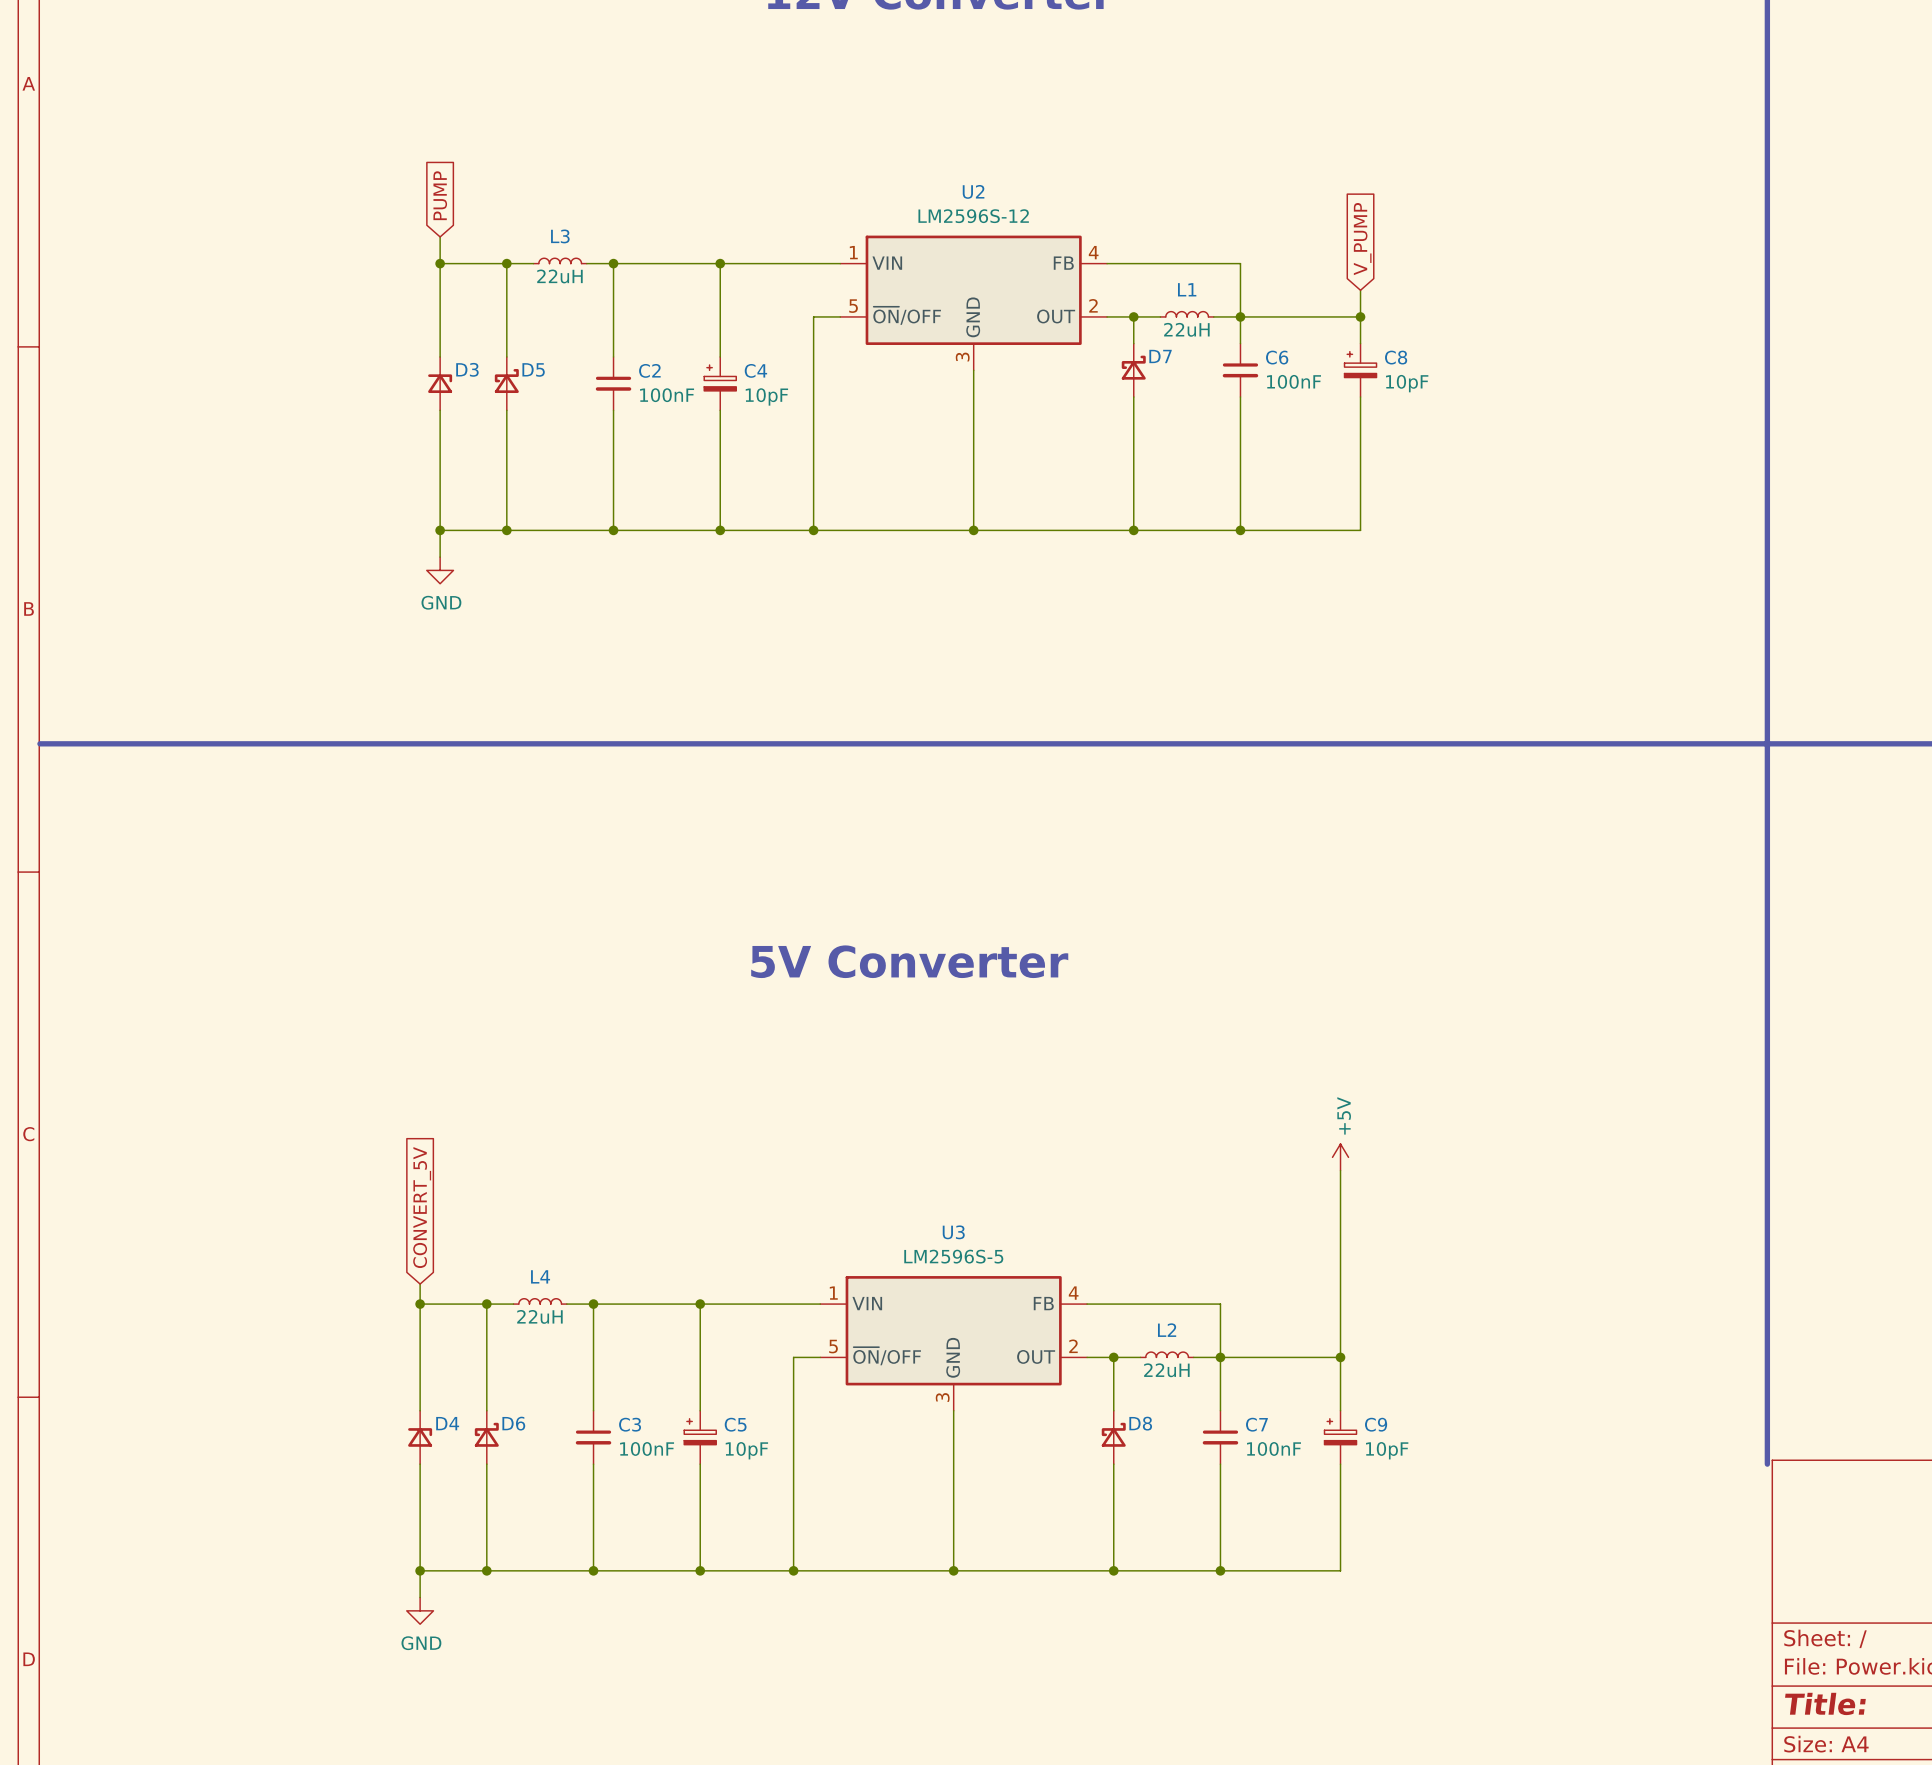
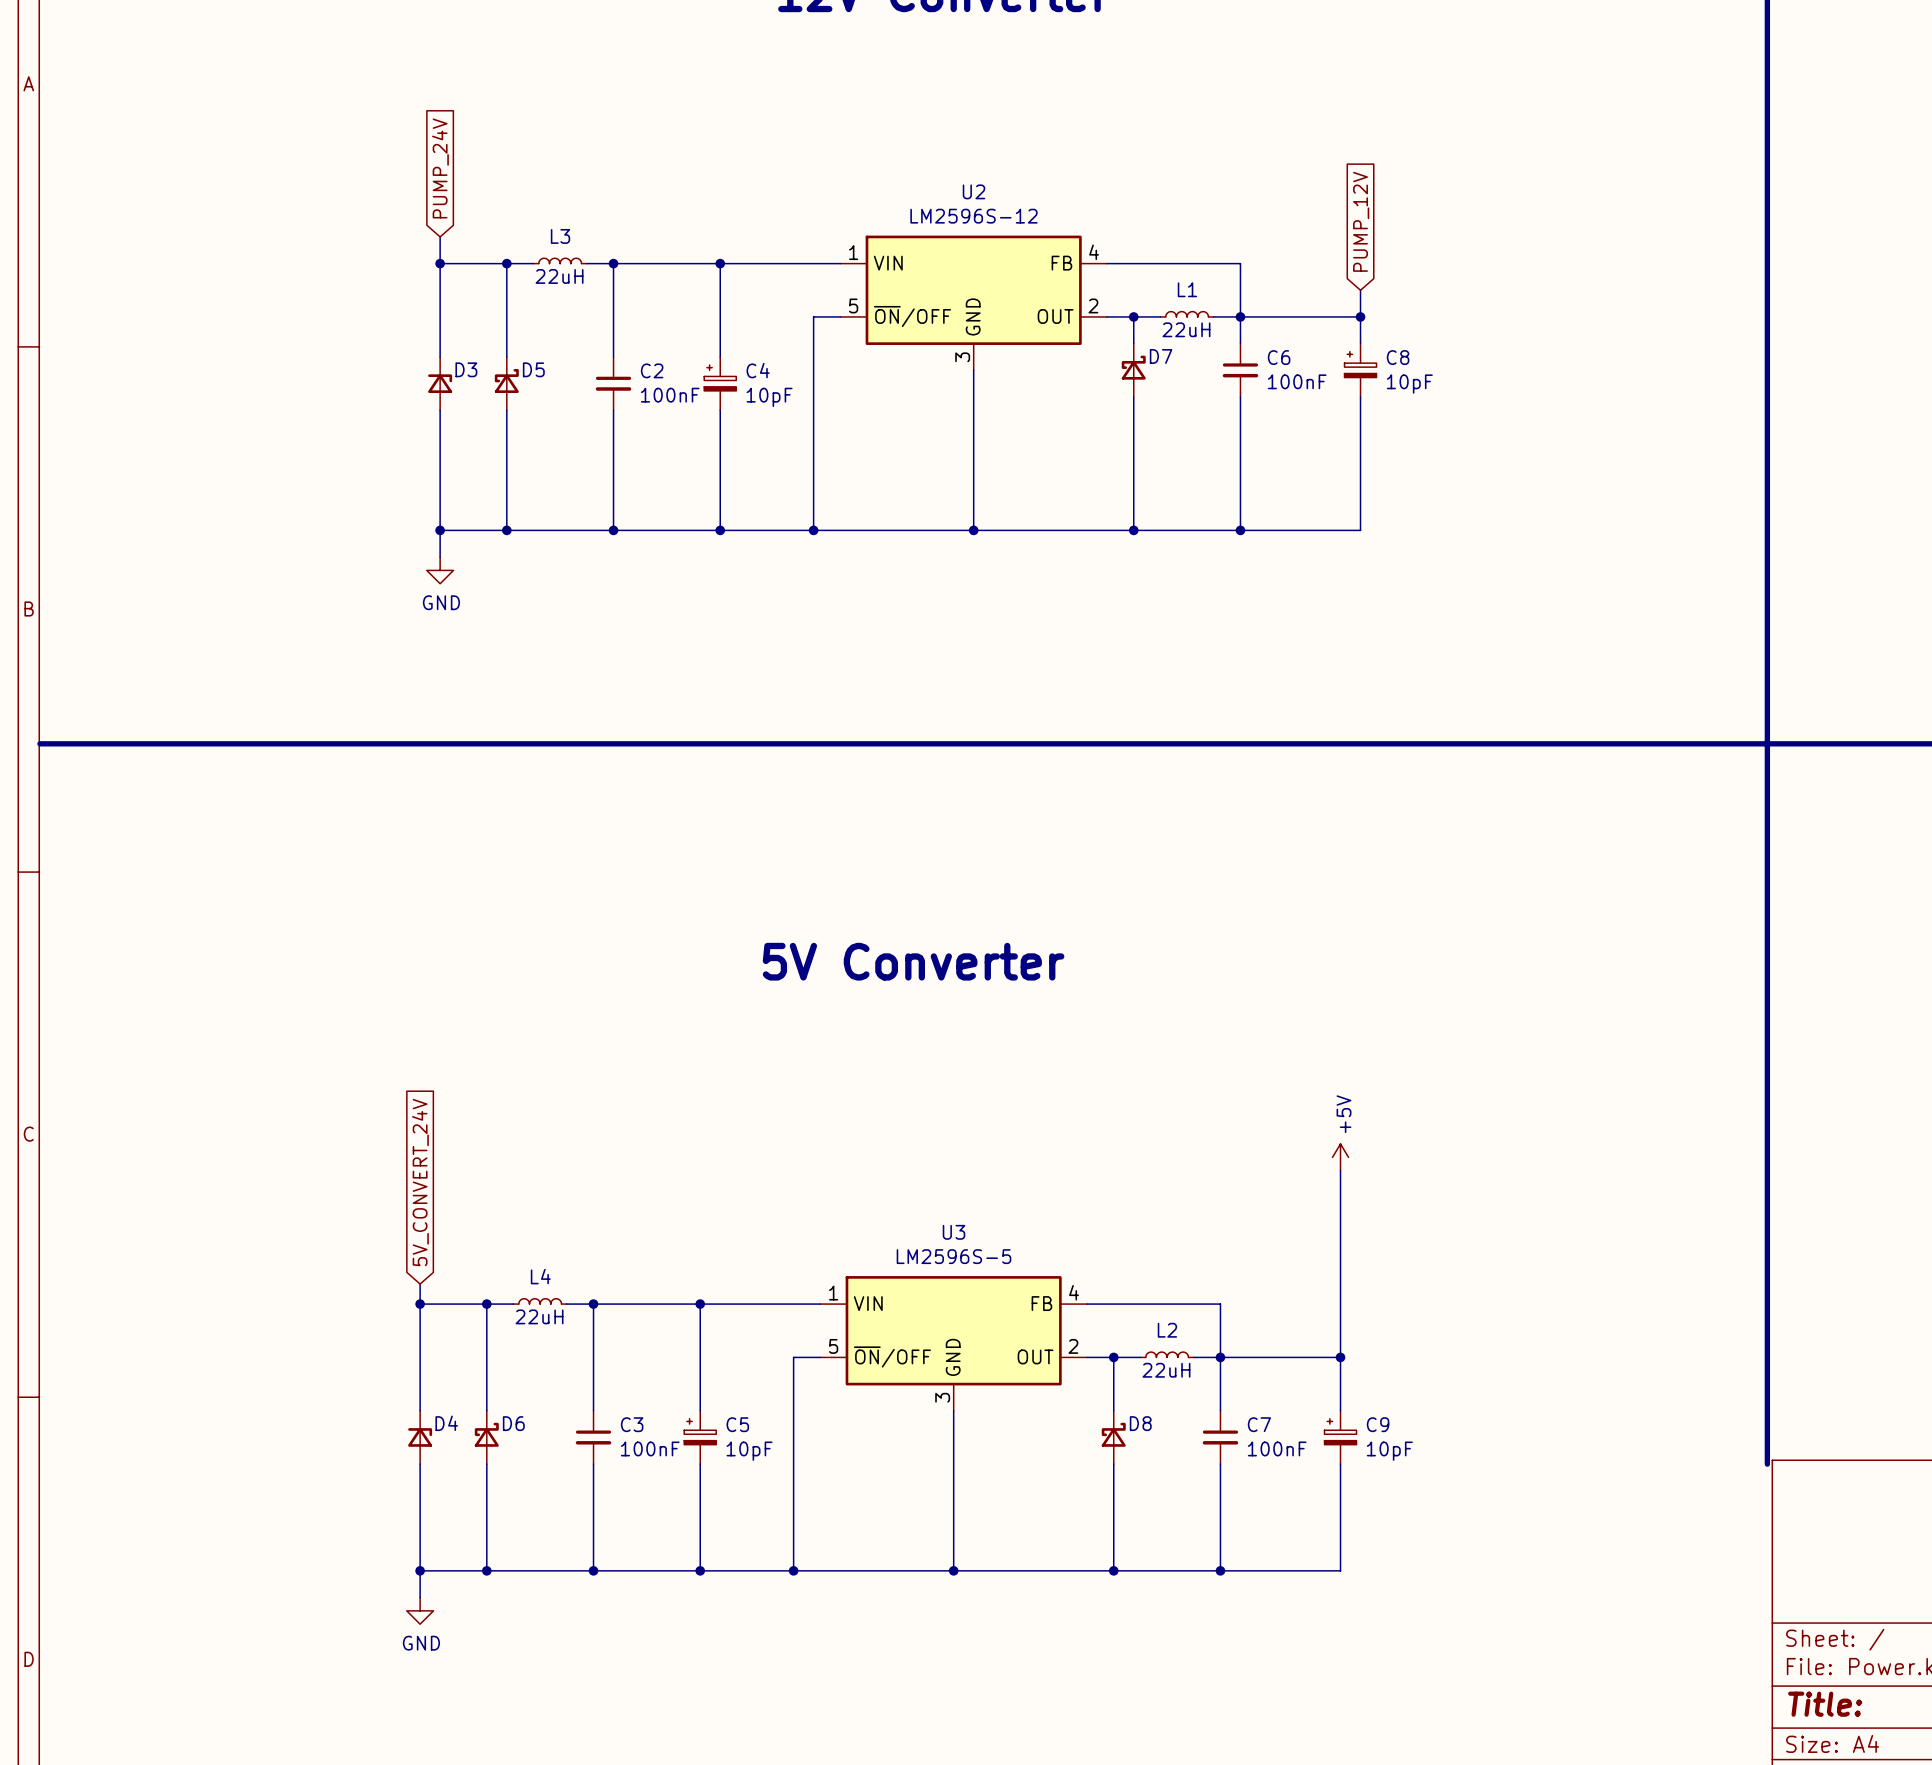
global label: PUMP (440, 195) -> PUMP_24V (440, 168)
global label: V_PUMP (1362, 239) -> PUMP_12V (1361, 221)
global label: CONVERT_5V (422, 1207) -> 5V_CONVERT_24V (420, 1182)

